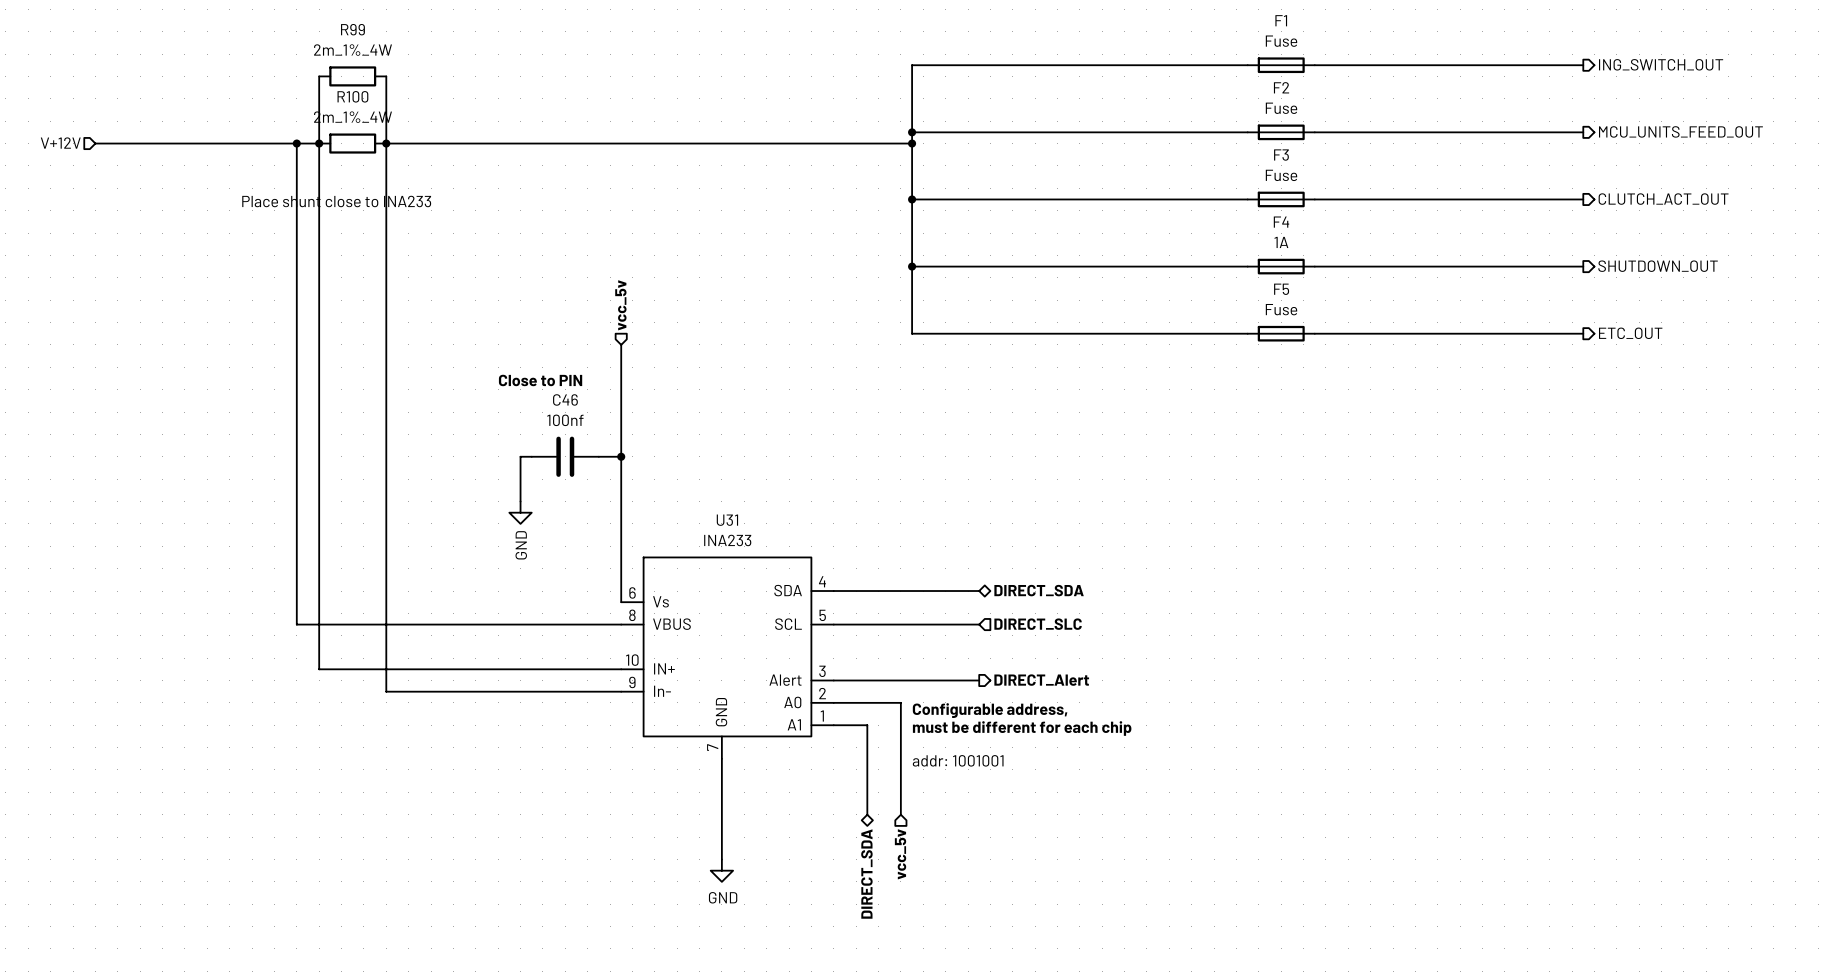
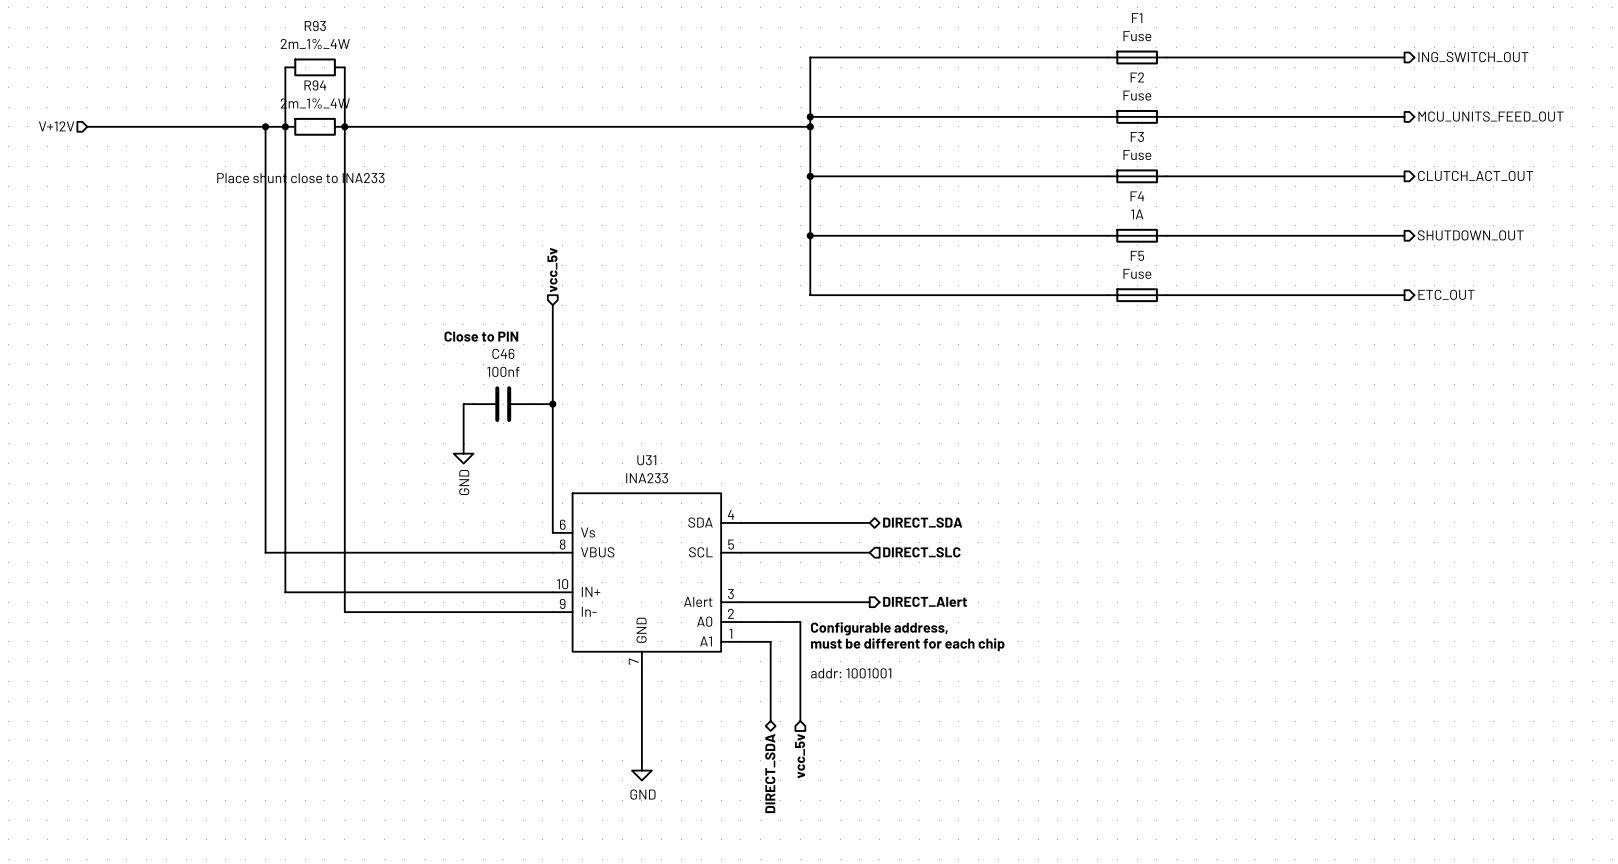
R99 name: R99 (352, 29) -> R93 (315, 26)
R100 name: R100 (352, 96) -> R94 (315, 85)

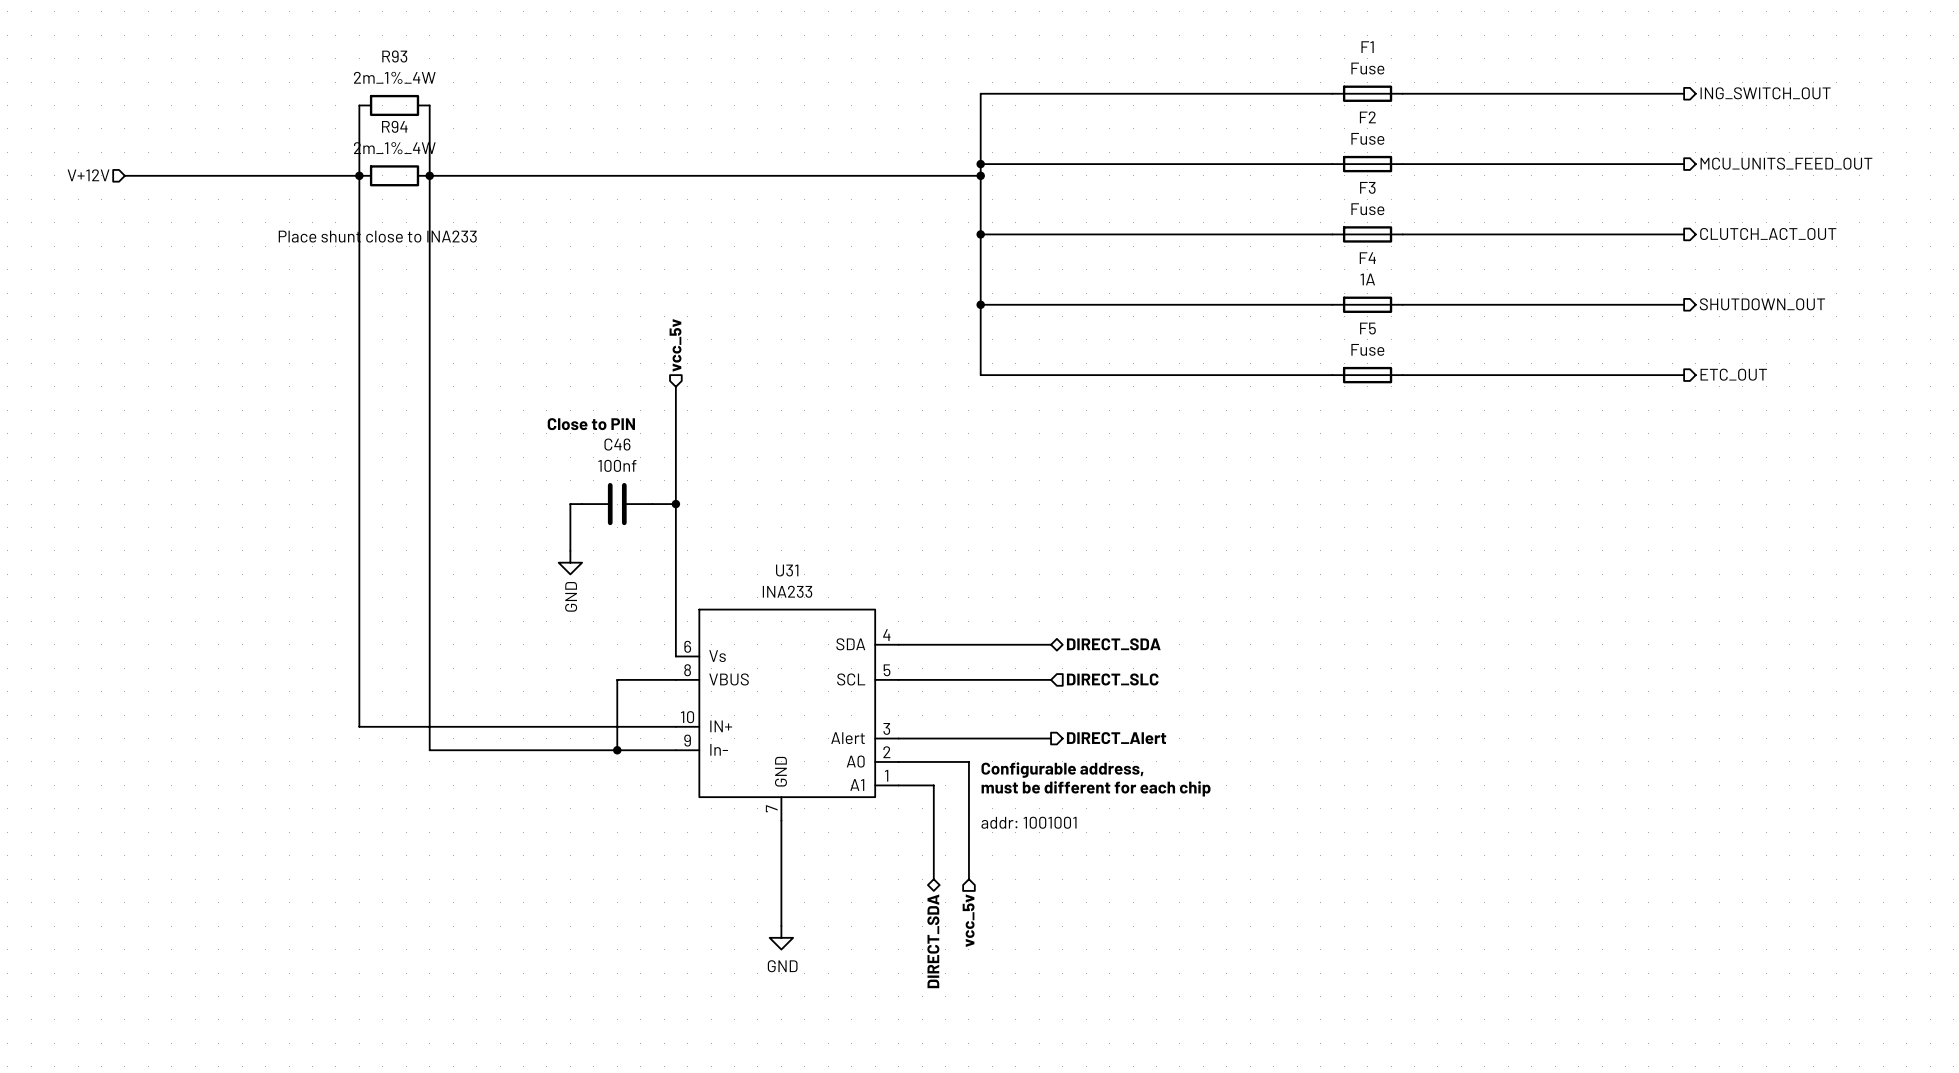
wire: (265, 126) (265, 552) (503, 552) -> (617, 750) (617, 679)
junction: (265, 126) -> none
junction: none -> (617, 750)

